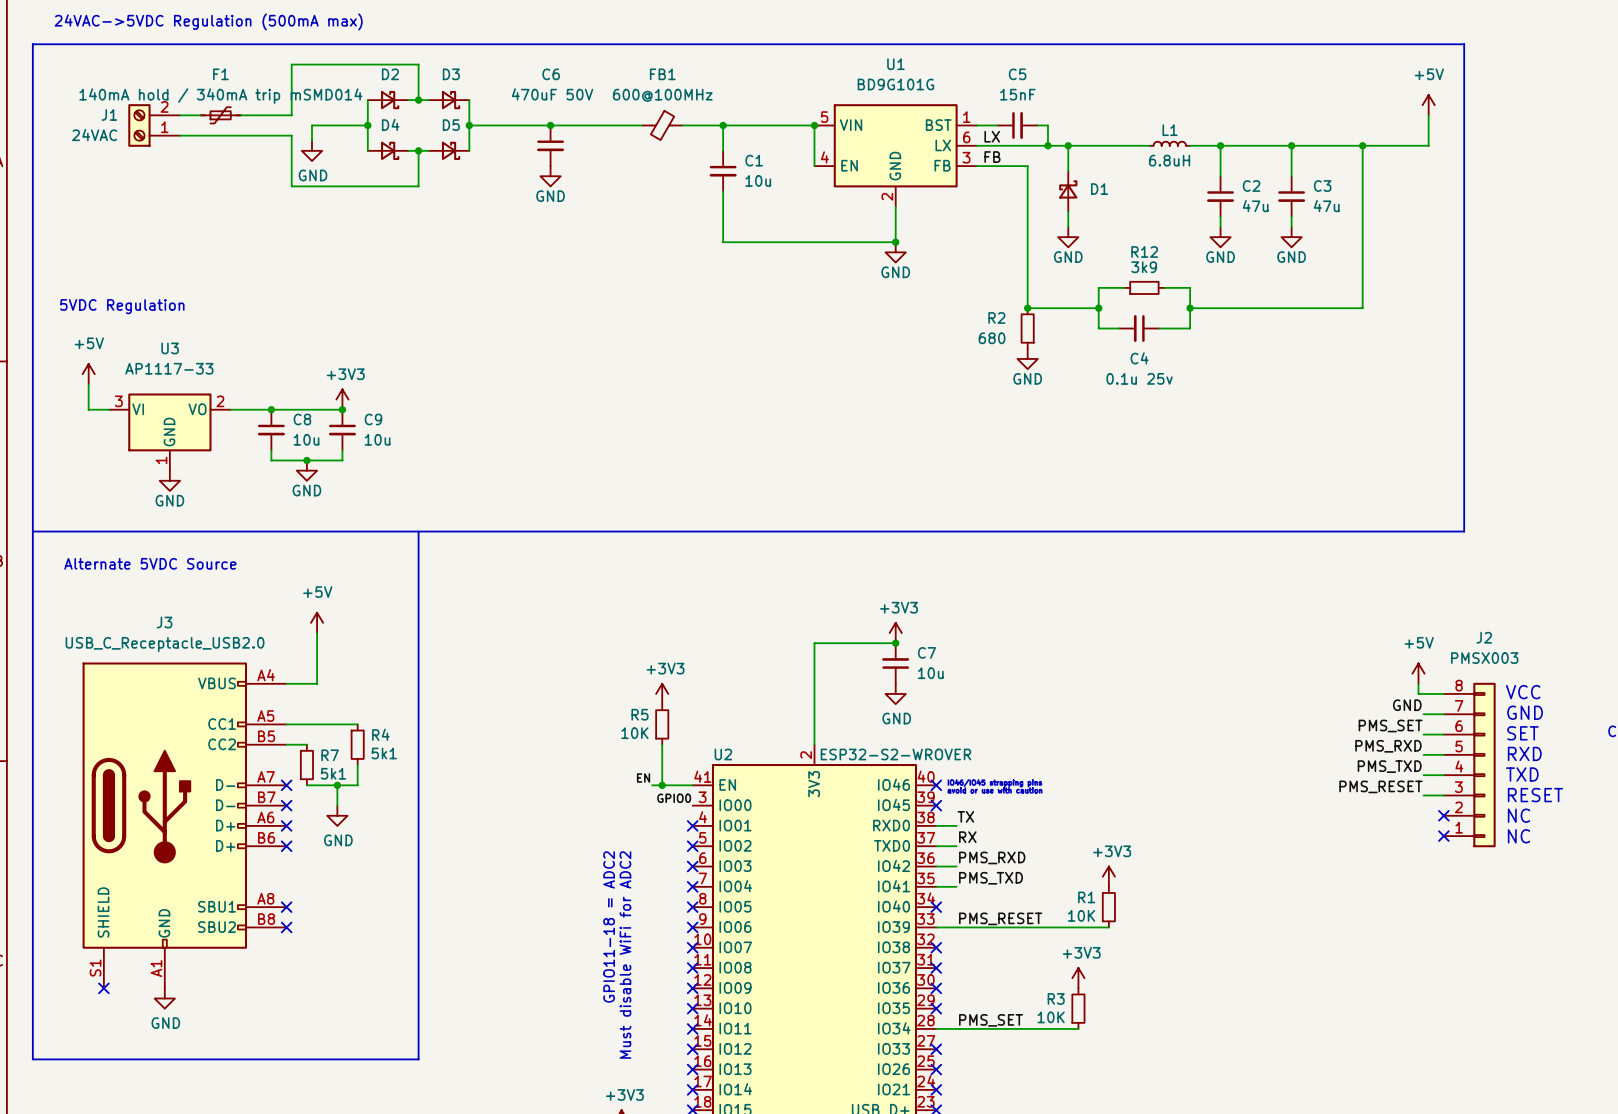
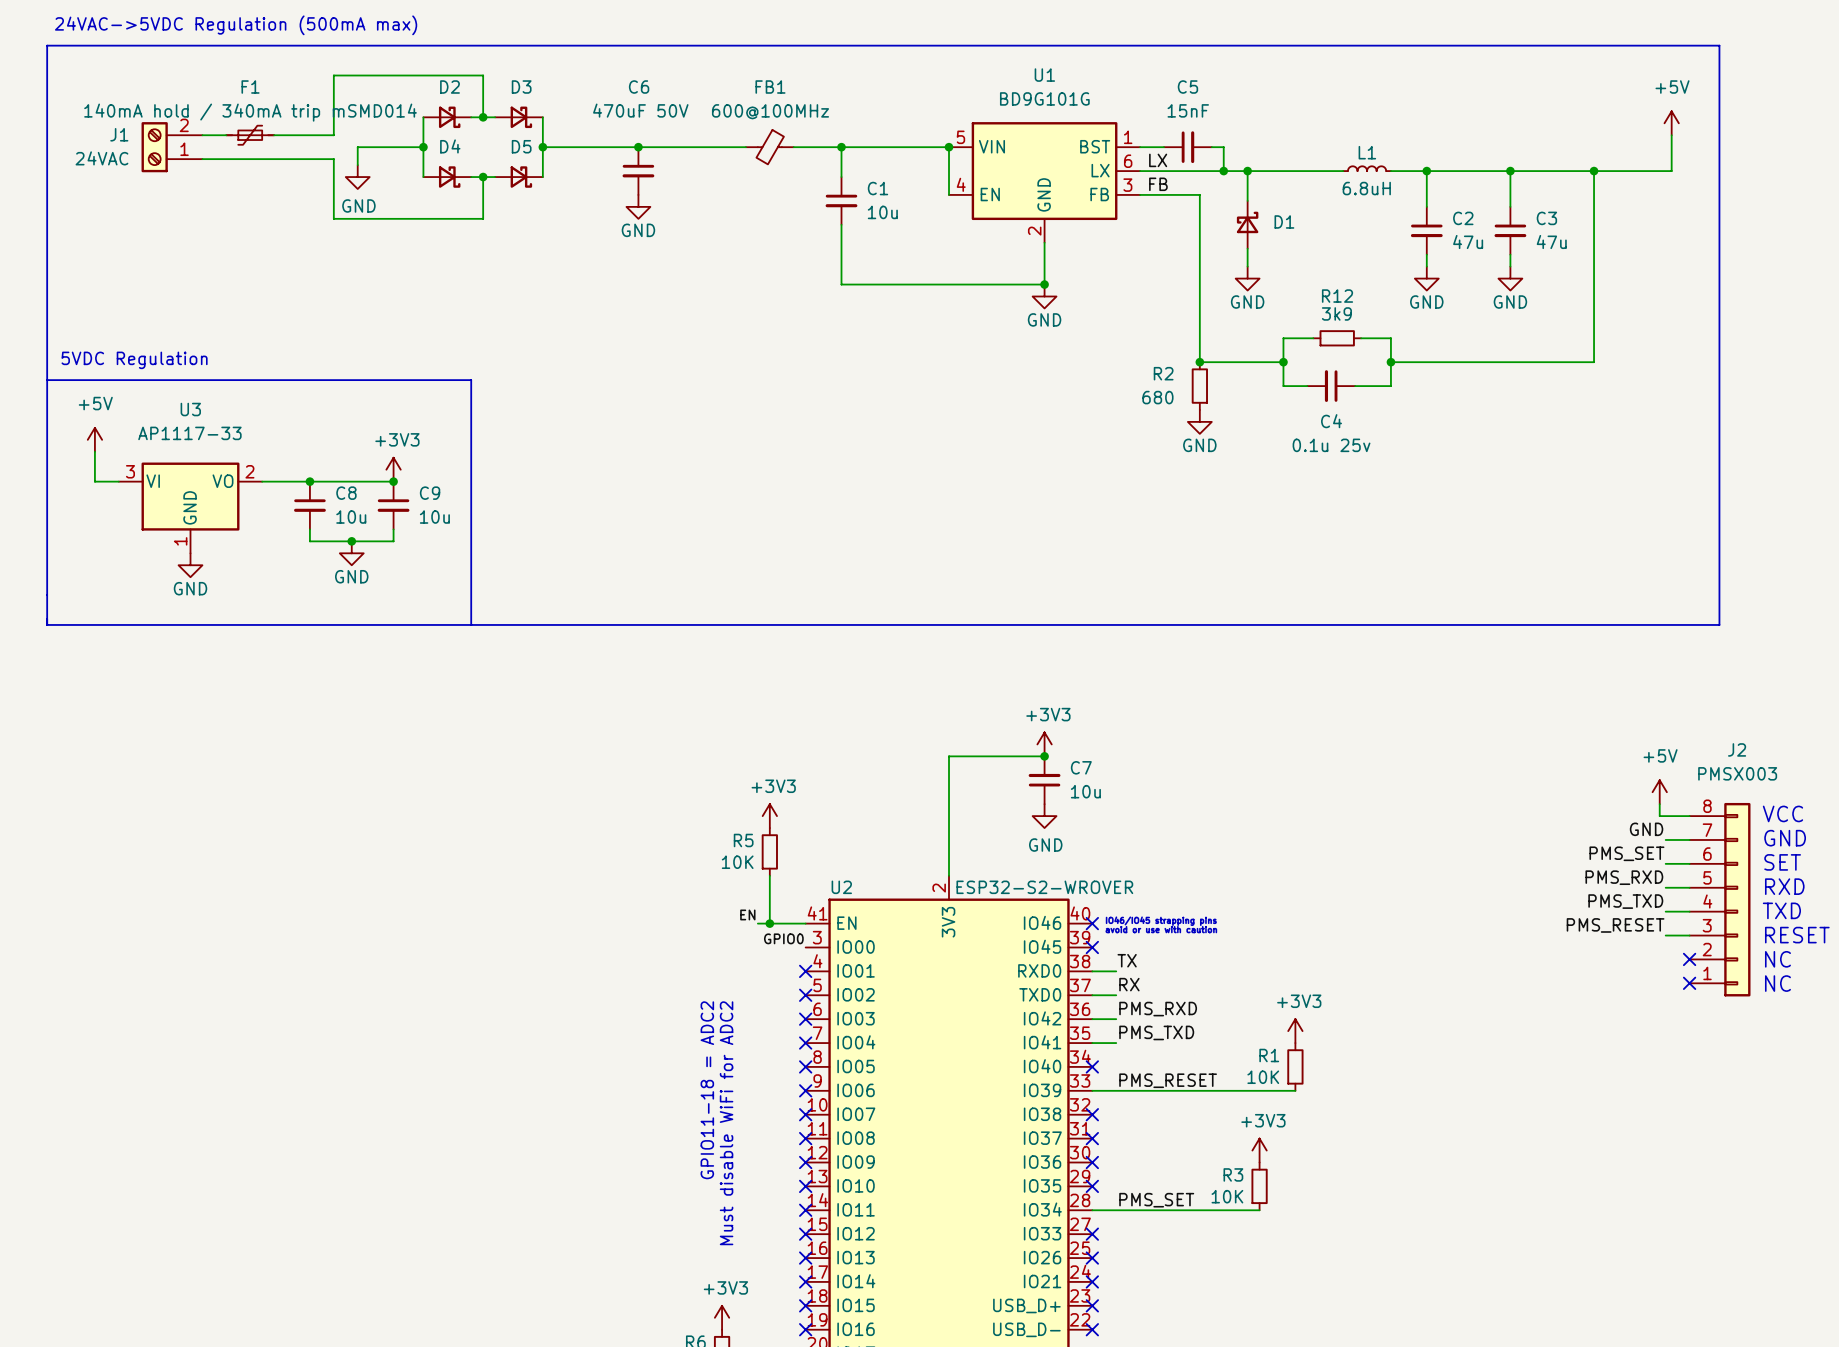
line: none -> (47, 380) (471, 380) (471, 624)
line: (32, 531) (48, 531) -> none
line: (418, 531) (418, 1059) (32, 1059) (32, 44) (1464, 44) (1464, 531) -> (47, 624) (47, 45) (1719, 45) (1719, 624) (1713, 624)
text: Alternate 5VDC Source (150, 563) -> none
power symbol: +5V (317, 622) -> none
wire: (317, 633) (317, 683) (286, 683) -> none
wire: (286, 724) (357, 724) -> none
wire: (286, 744) (306, 744) -> none
R4: 5k1 (357, 744) -> none
R7: 5k1 (306, 765) -> none
wire: (357, 765) (357, 785) (306, 785) -> none
no-connect mark: (286, 785) -> none
wire: (337, 785) (337, 805) -> none
junction: (337, 785) -> none
no-connect mark: (286, 805) -> none
power symbol: GND (337, 815) -> none
J3: USB_C_Receptacle_USB2.0 (184, 825) -> none
no-connect mark: (286, 825) -> none
no-connect mark: (286, 846) -> none
no-connect mark: (286, 907) -> none
no-connect mark: (286, 927) -> none
no-connect mark: (103, 988) -> none
power symbol: GND (164, 998) -> none

